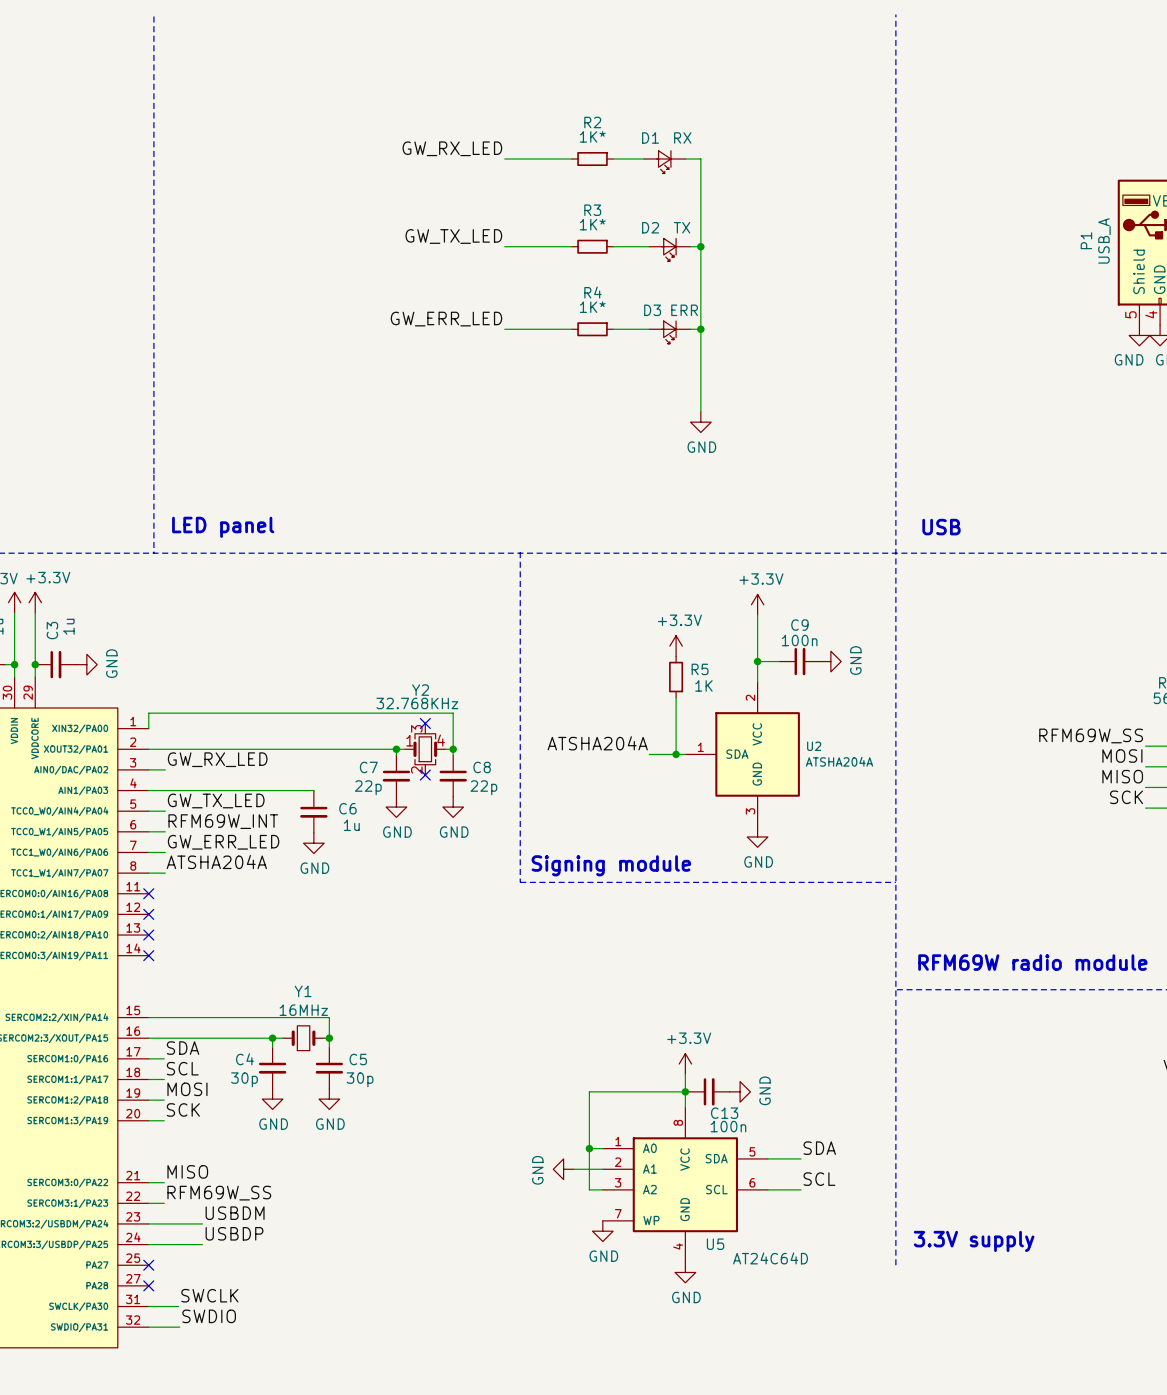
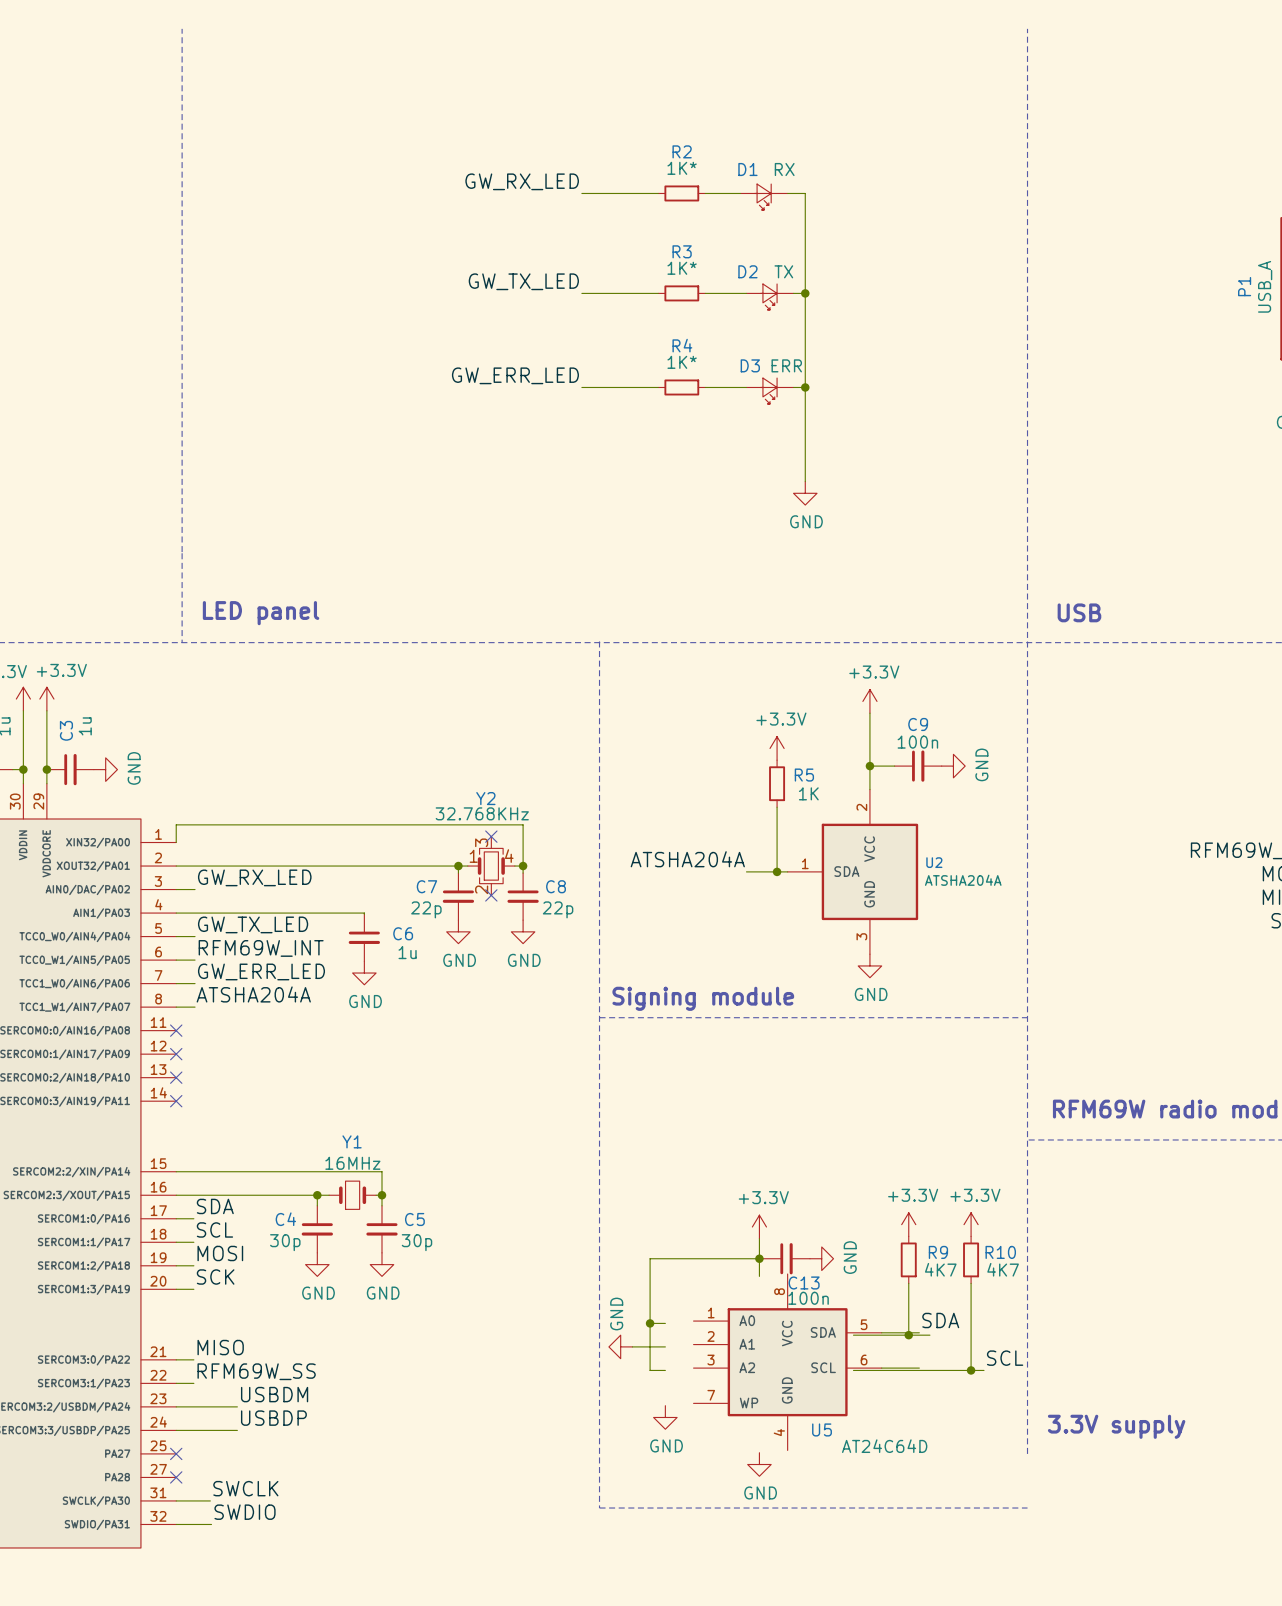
line: none -> (599, 1017) (599, 1508) (1027, 1508)
power symbol position: +3.3V (685, 1064) -> +3.3V (759, 1226)
power symbol: none -> +3.3V (908, 1224)
power symbol: none -> +3.3V (971, 1224)
wire: (685, 1074) (685, 1107) -> (759, 1238) (759, 1276)
junction position: (685, 1091) -> (759, 1258)
wire: (688, 1091) (589, 1091) (589, 1189) (602, 1189) -> (762, 1258) (650, 1258) (650, 1370) (665, 1370)
C13 position: (709, 1091) -> (786, 1258)
power symbol position: GND (740, 1091) -> GND (821, 1258)
R9: none -> 4K7 (908, 1259)
R10: none -> 4K7 (971, 1259)
wire: none -> (908, 1283) (908, 1335)
wire: none -> (971, 1283) (971, 1370)
wire: (589, 1148) (602, 1148) -> (650, 1323) (665, 1323)
junction position: (589, 1148) -> (650, 1323)
wire: none -> (853, 1335) (929, 1335)
junction: none -> (908, 1335)
power symbol position: GND (563, 1169) -> GND (620, 1346)
wire: (573, 1169) (602, 1169) -> (632, 1346) (665, 1346)
power symbol text position: GND (537, 1170) -> GND (616, 1314)
label position: SCL (819, 1179) -> SCL (1005, 1358)
wire: none -> (853, 1370) (984, 1370)
junction: none -> (971, 1370)
power symbol position: GND (602, 1231) -> GND (665, 1417)
power symbol position: GND (685, 1272) -> GND (759, 1464)

